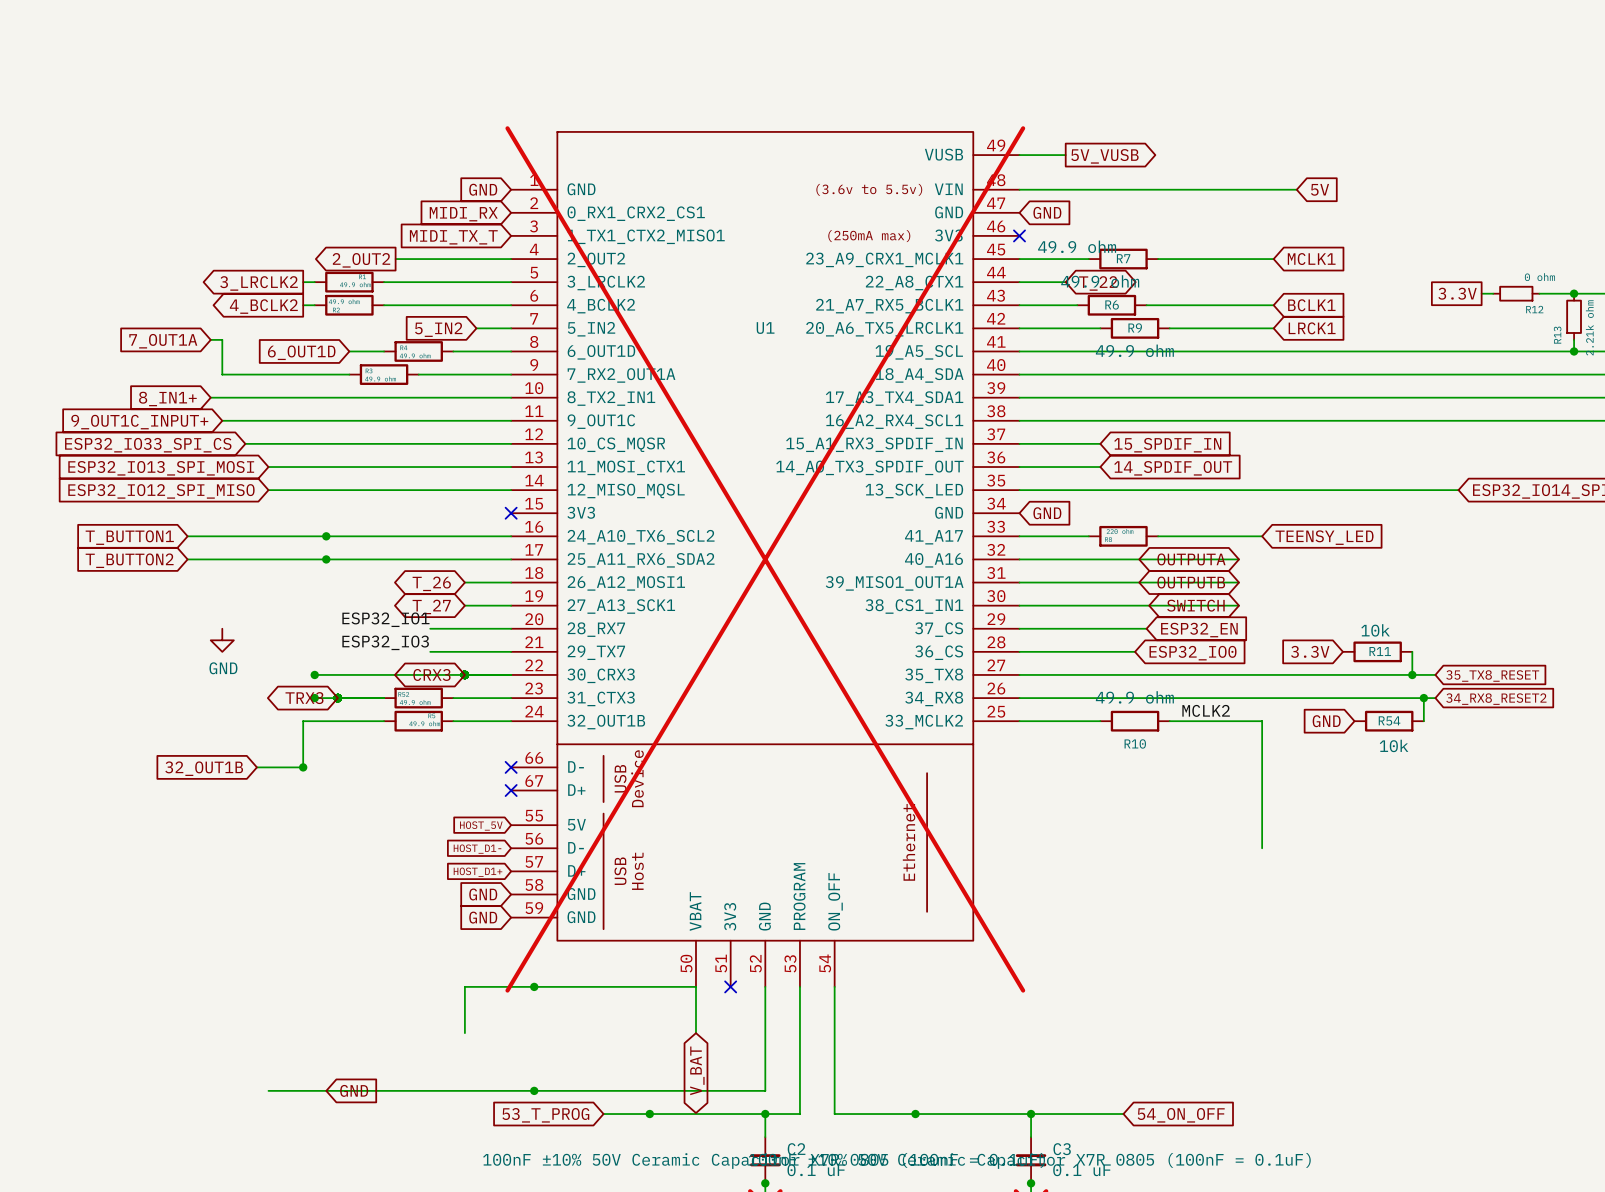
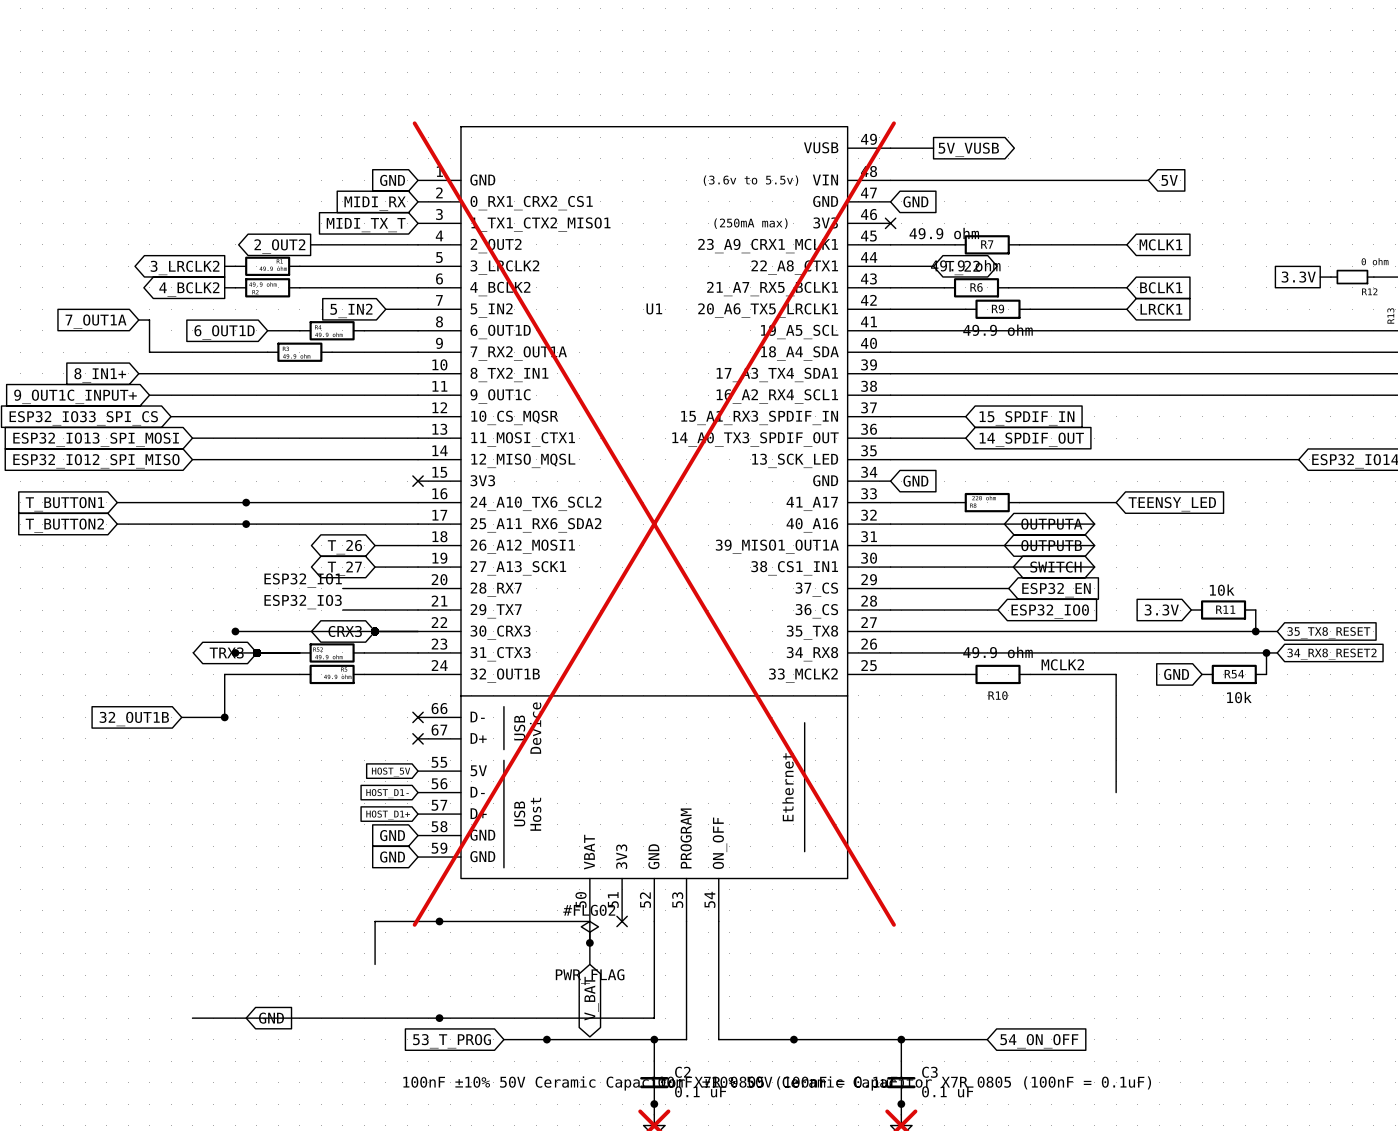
power symbol: GND (222, 640) -> none
#FLG02: none -> PWR_FLAG (589, 932)
junction: none -> (589, 942)

